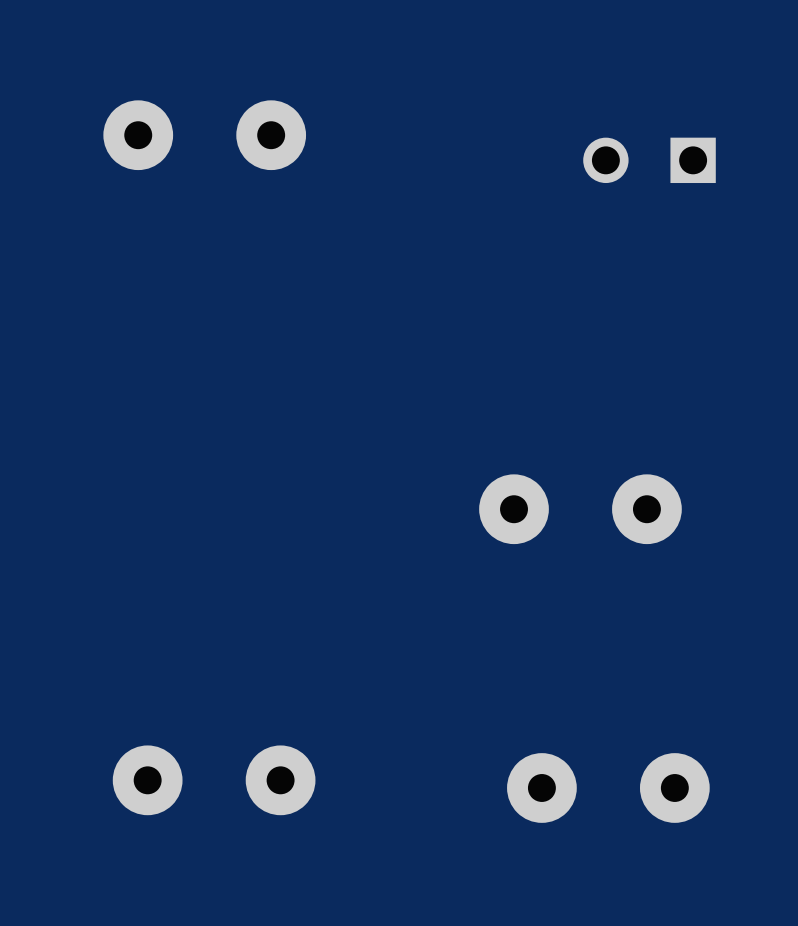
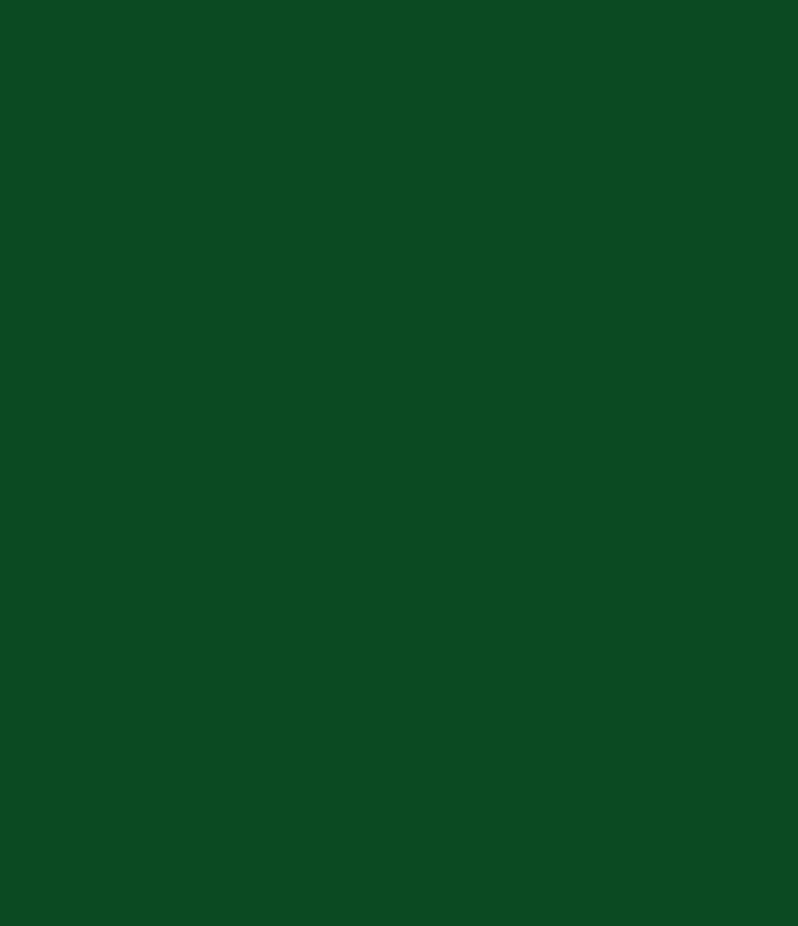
part: (204, 135) -> none
part: (649, 160) -> none
part: (580, 509) -> none
part: (214, 780) -> none
part: (608, 787) -> none

